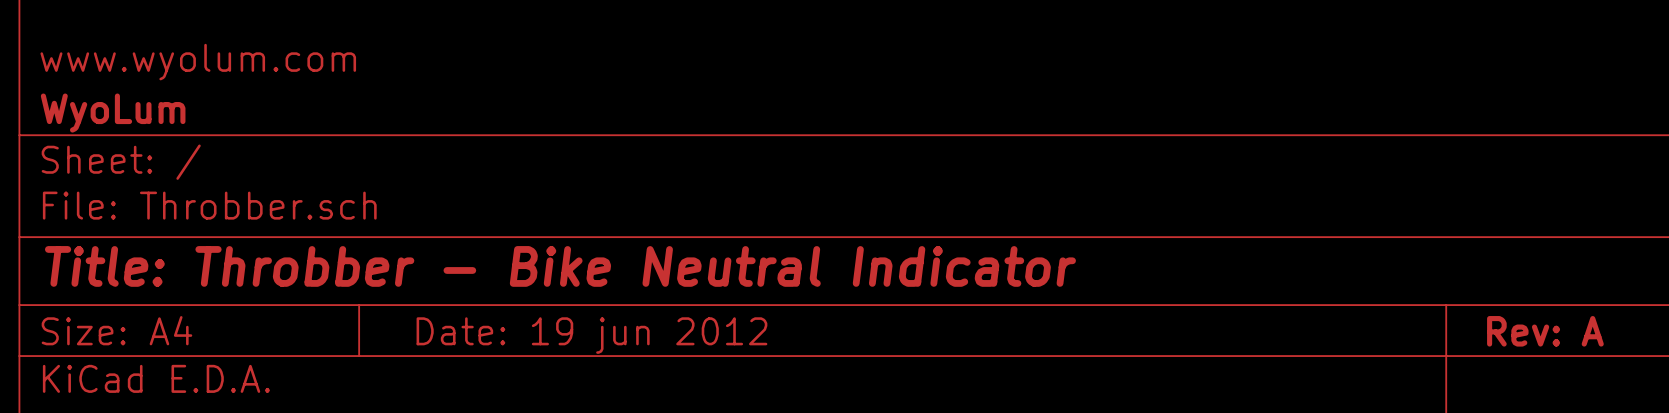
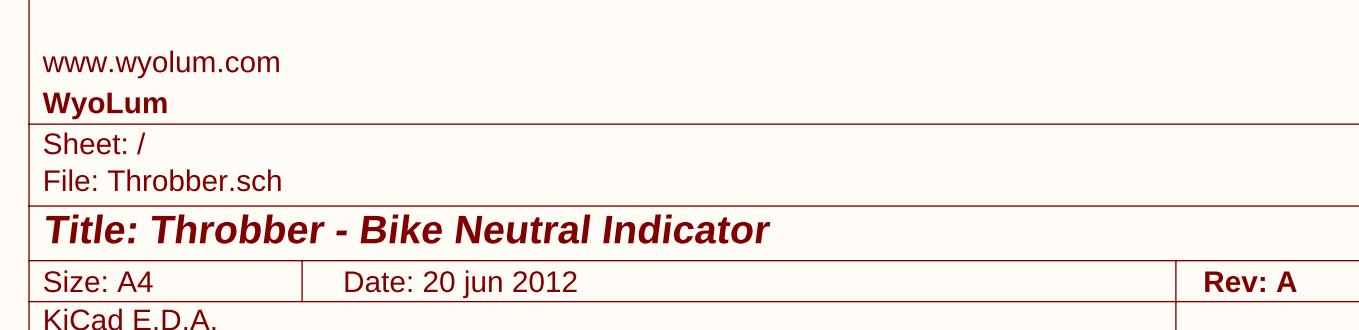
title block: Date: 19 jun 2012 (591, 335) -> Date: 20 jun 2012 (461, 284)

